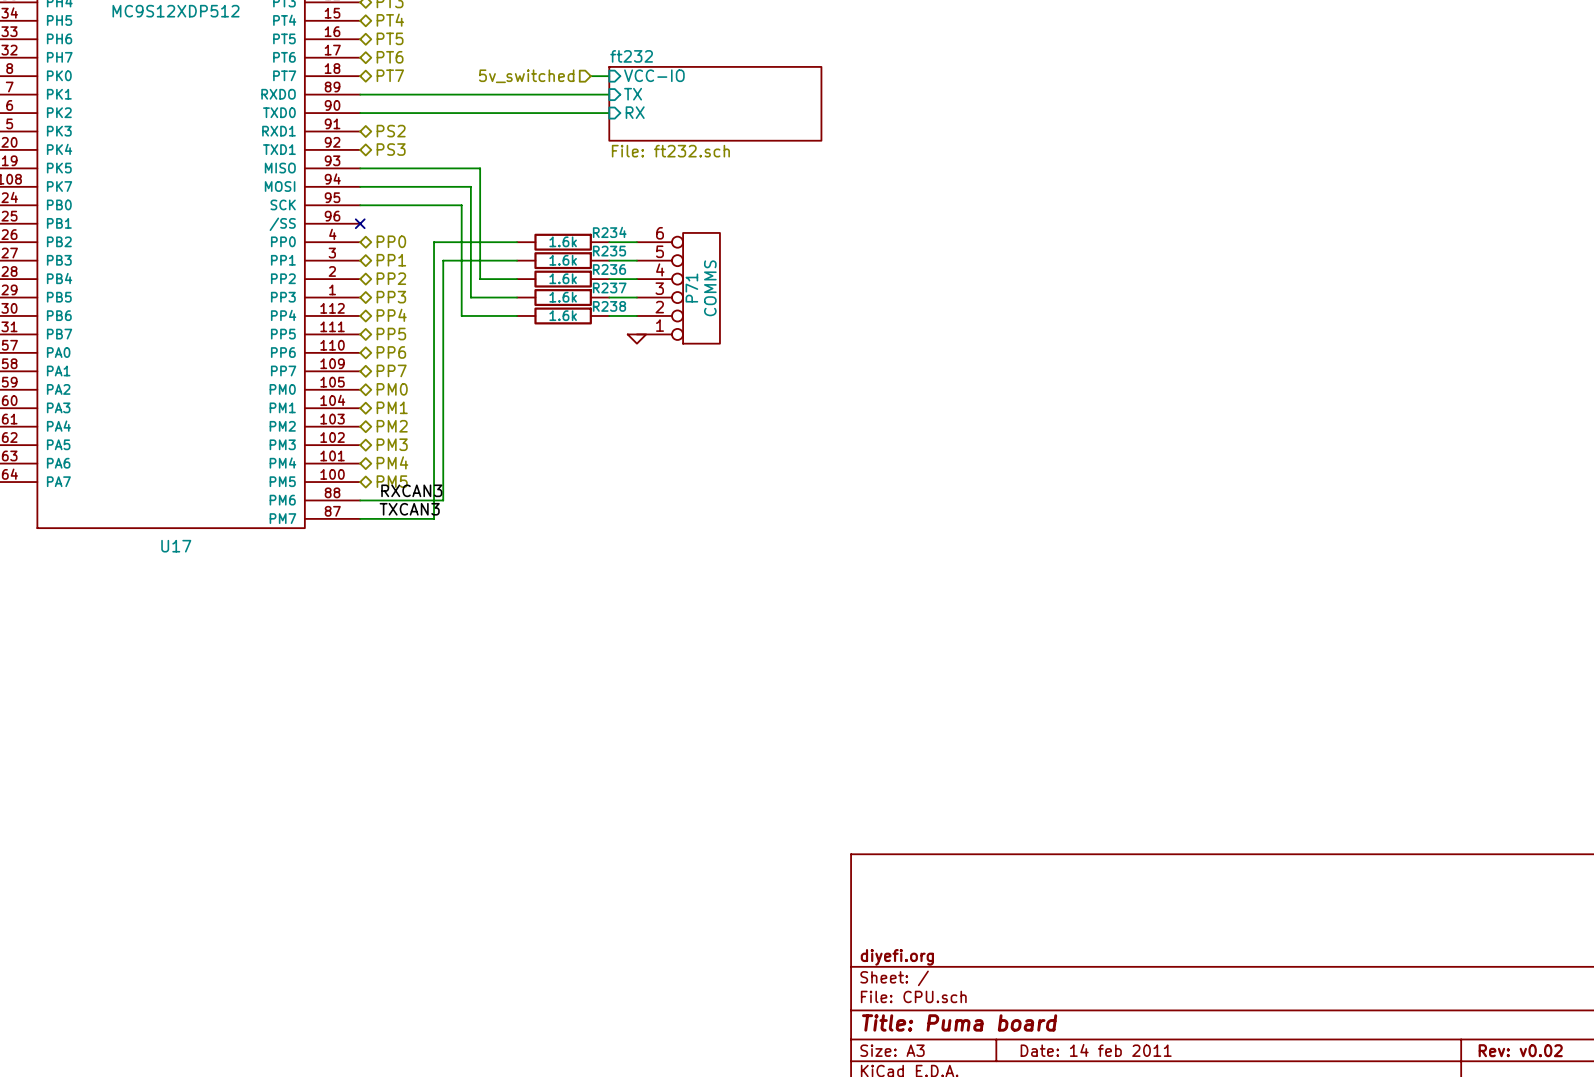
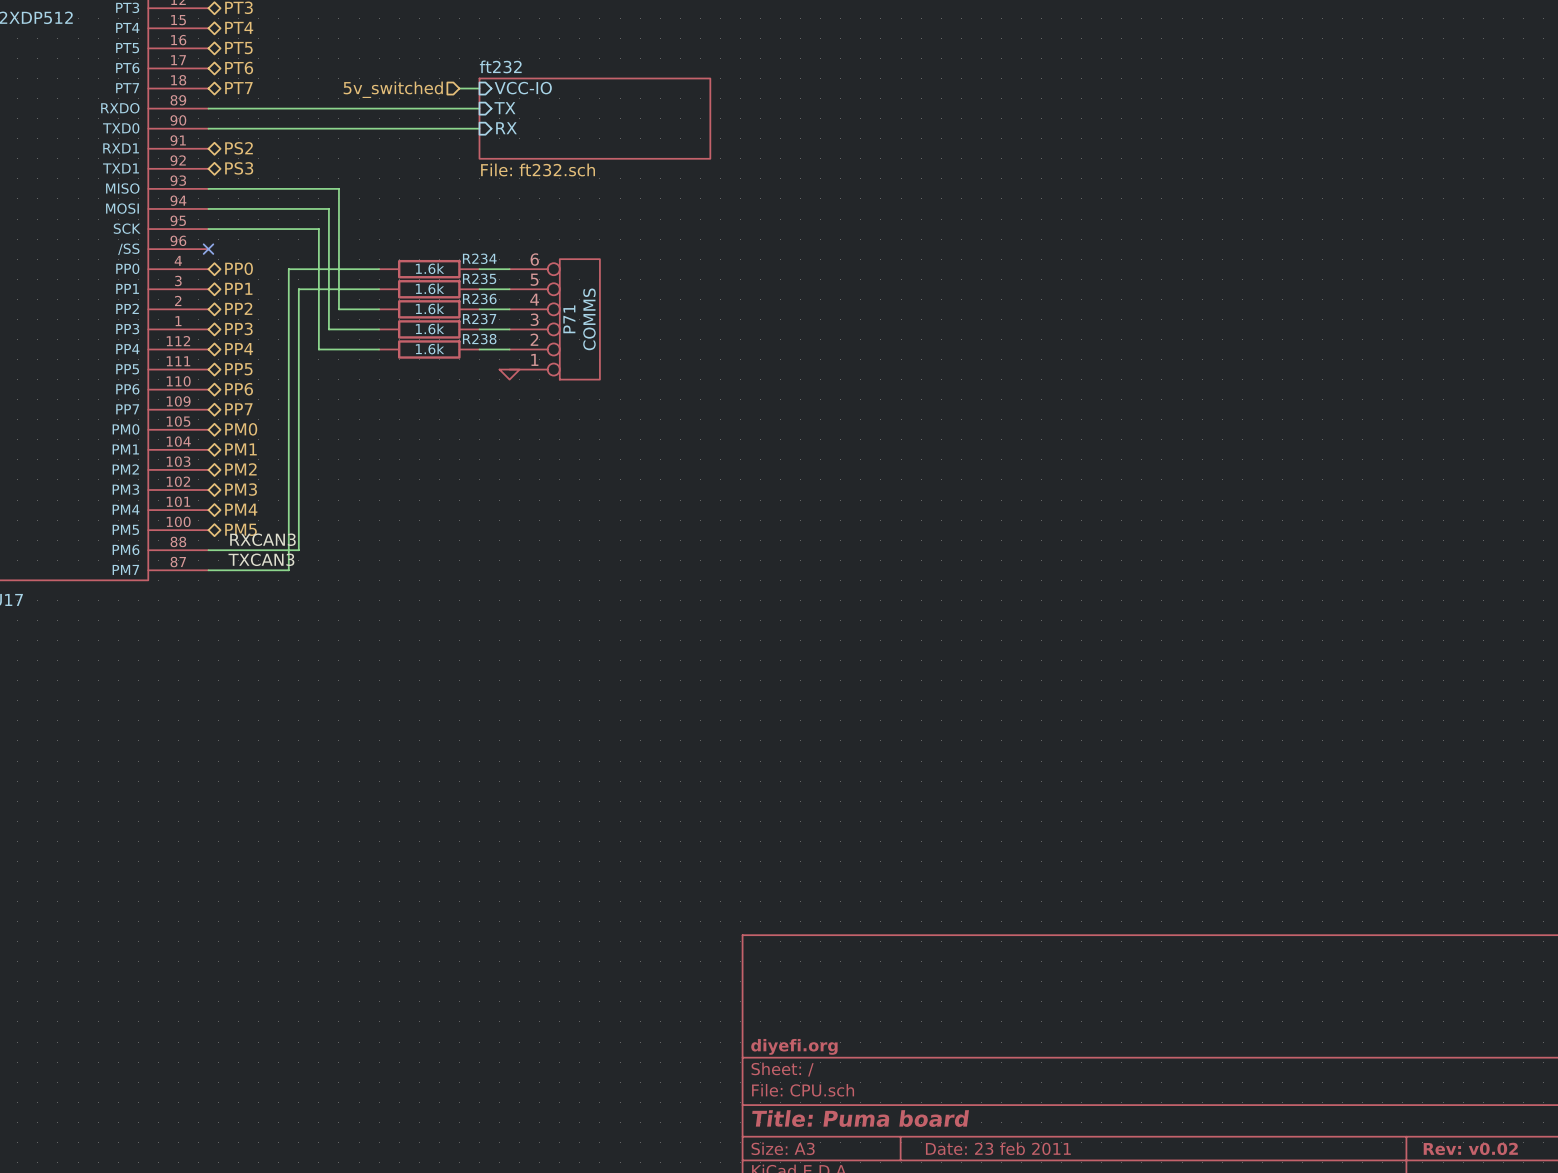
title block: Date: 14 feb 2011 (1096, 1050) -> Date: 23 feb 2011 (998, 1148)

